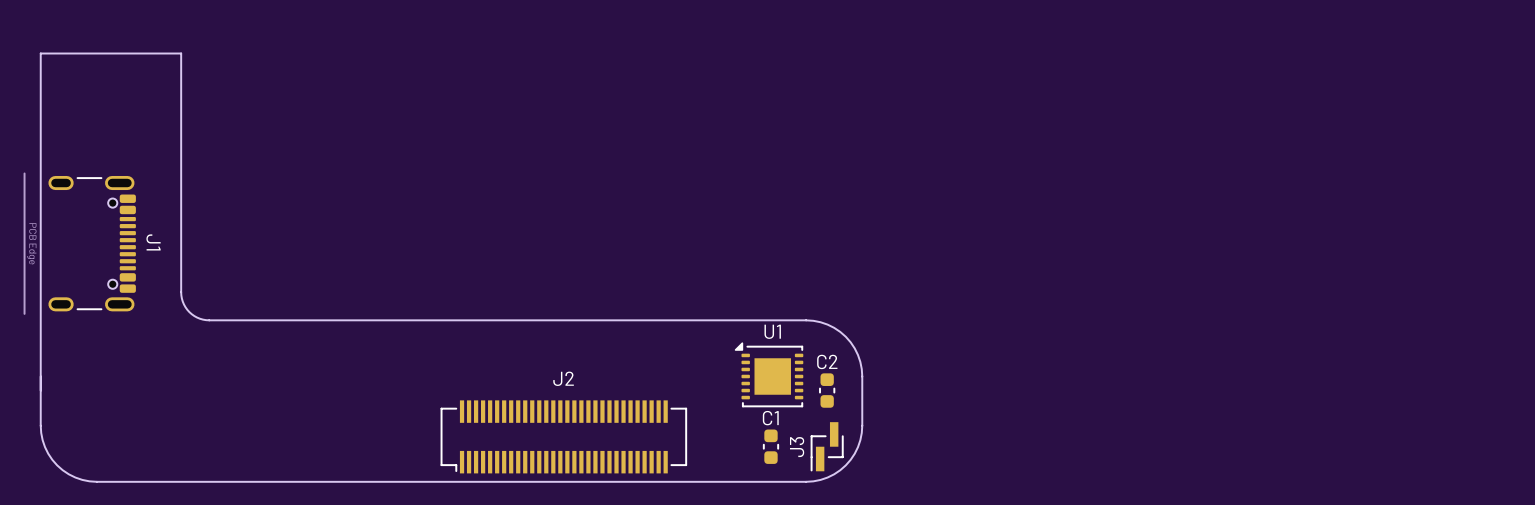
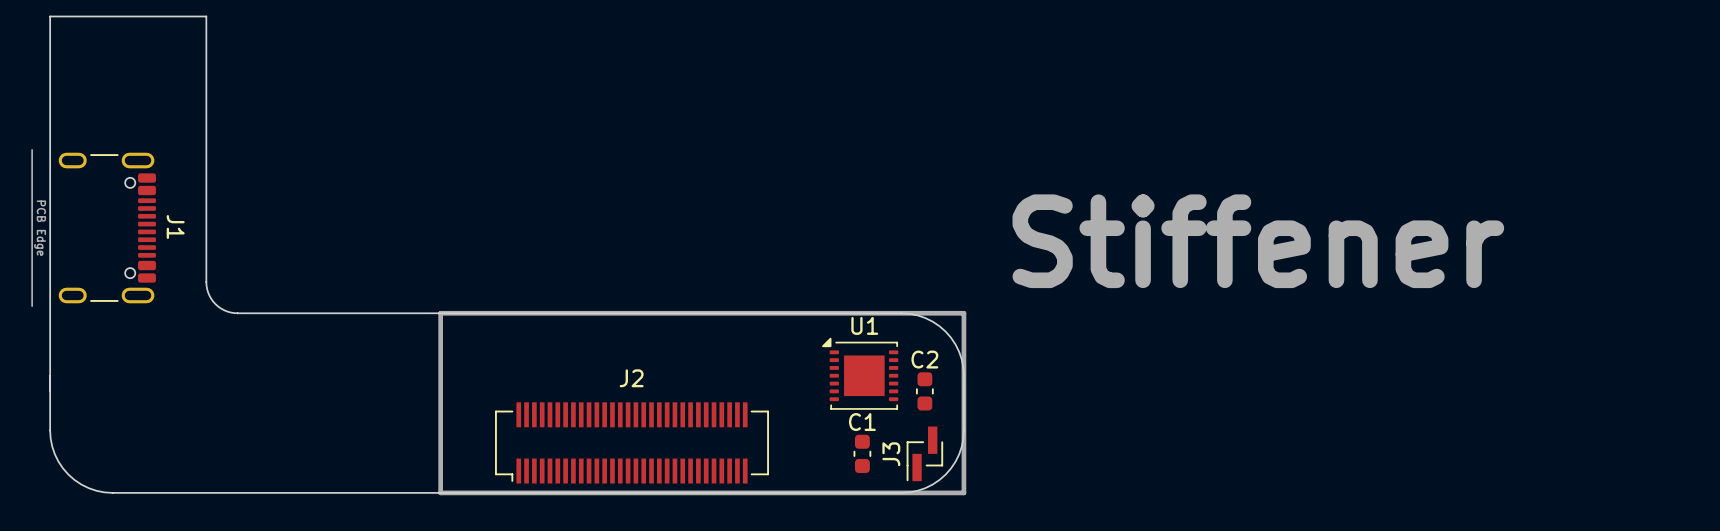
text: none -> Stiffener (1258, 241)
line: none -> (440, 313) (963, 313) (963, 492) (440, 492) (440, 313)

